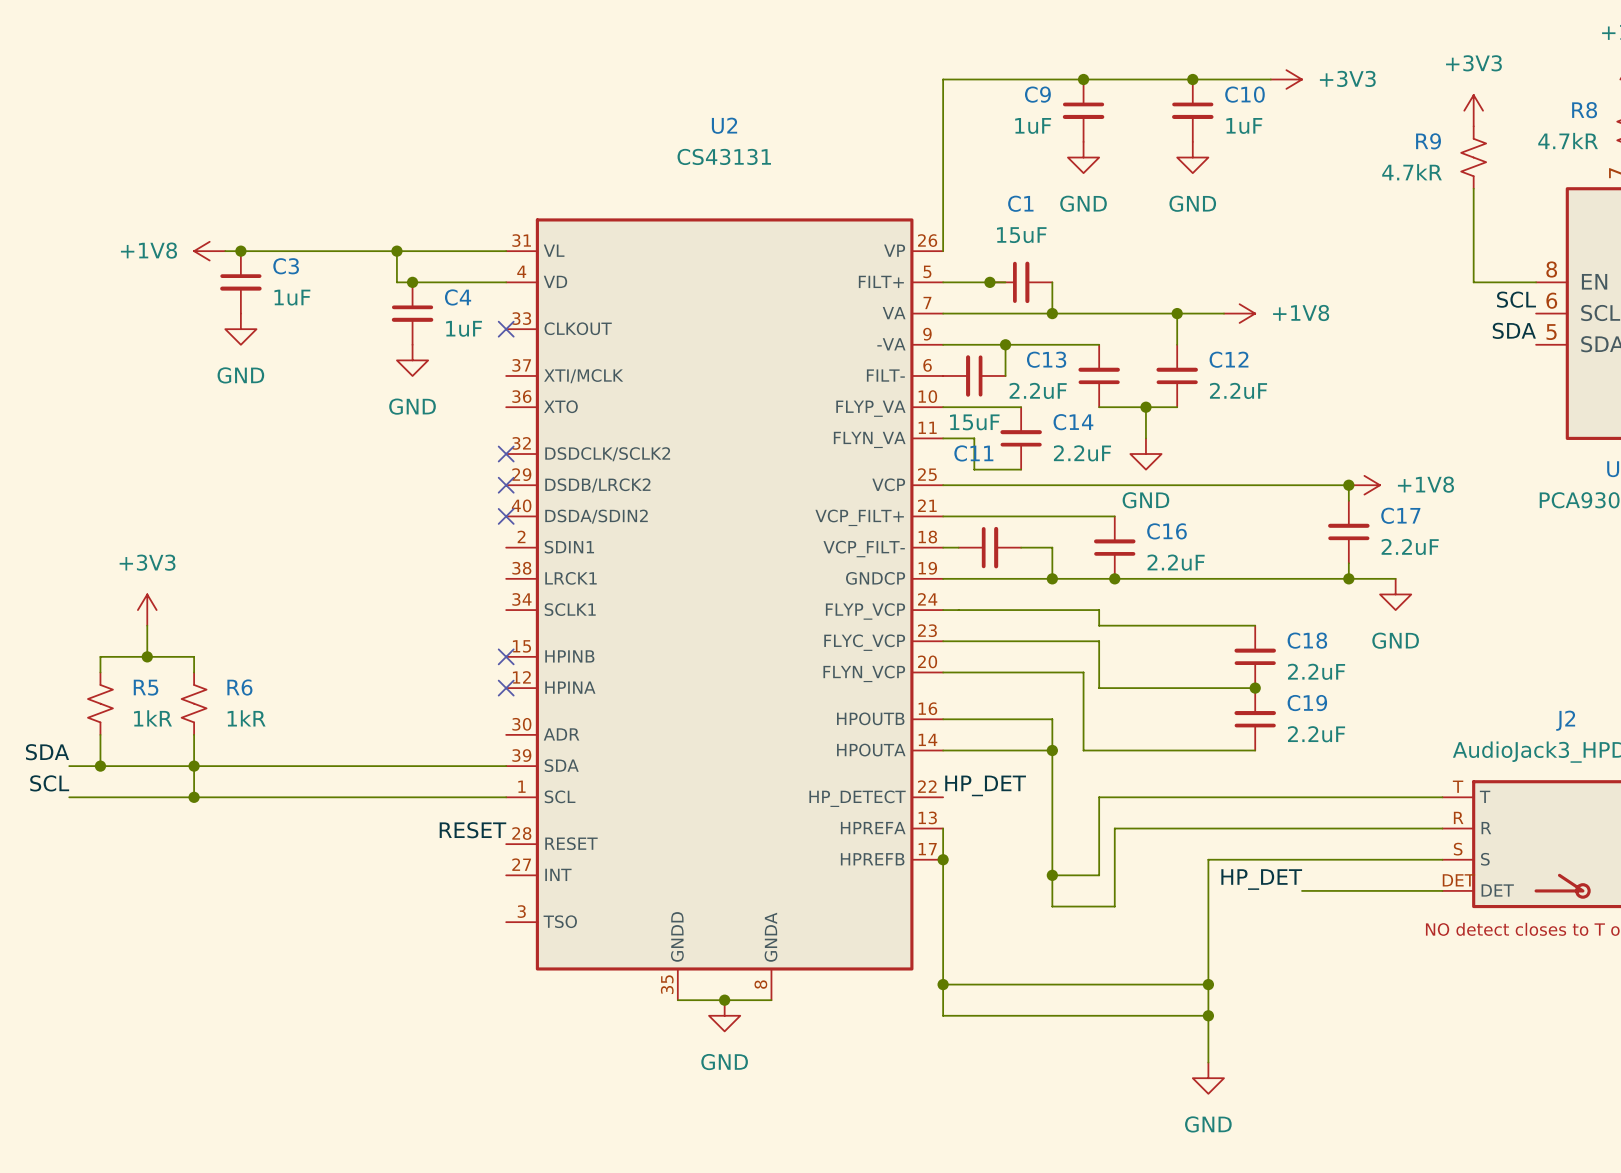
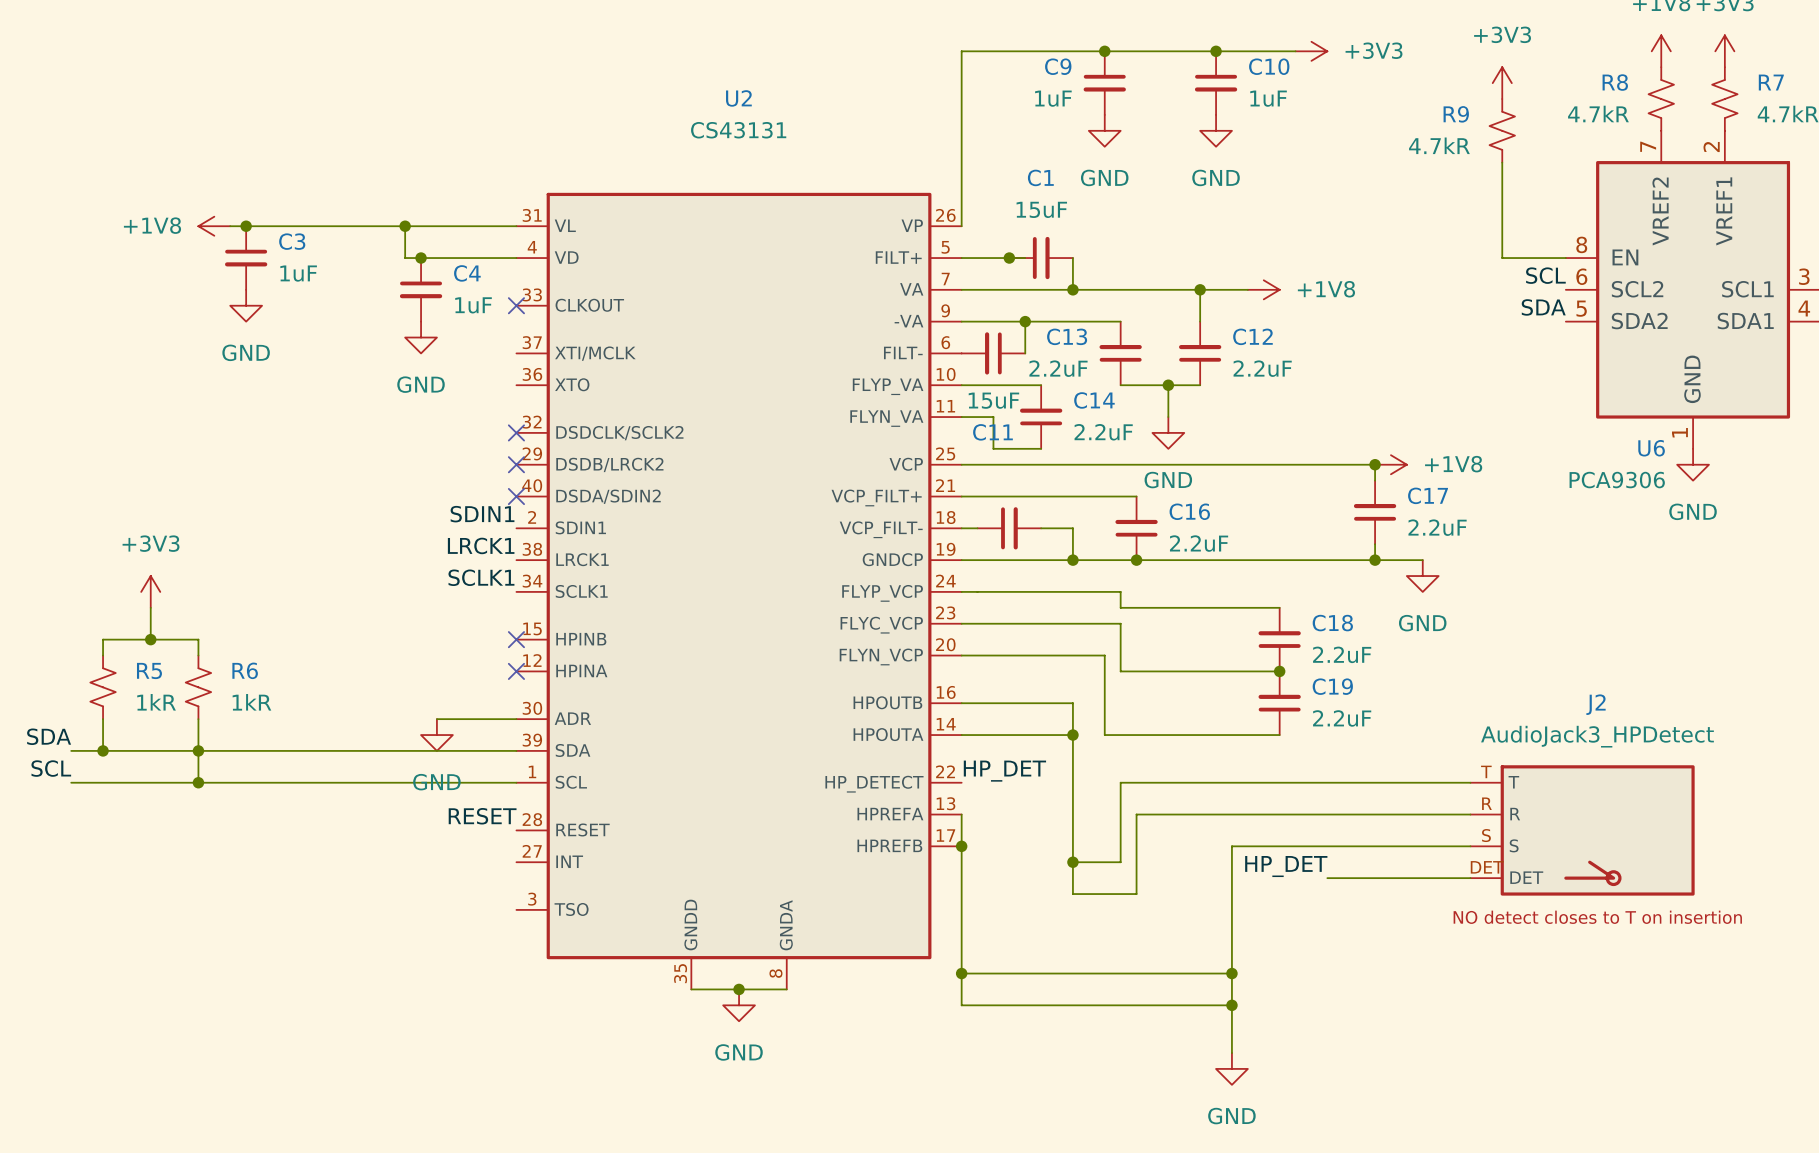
label: none -> SDIN1 (482, 514)
label: none -> LRCK1 (481, 545)
label: none -> SCLK1 (481, 577)
wire: none -> (436, 719) (516, 719)
power symbol: none -> GND (436, 735)

